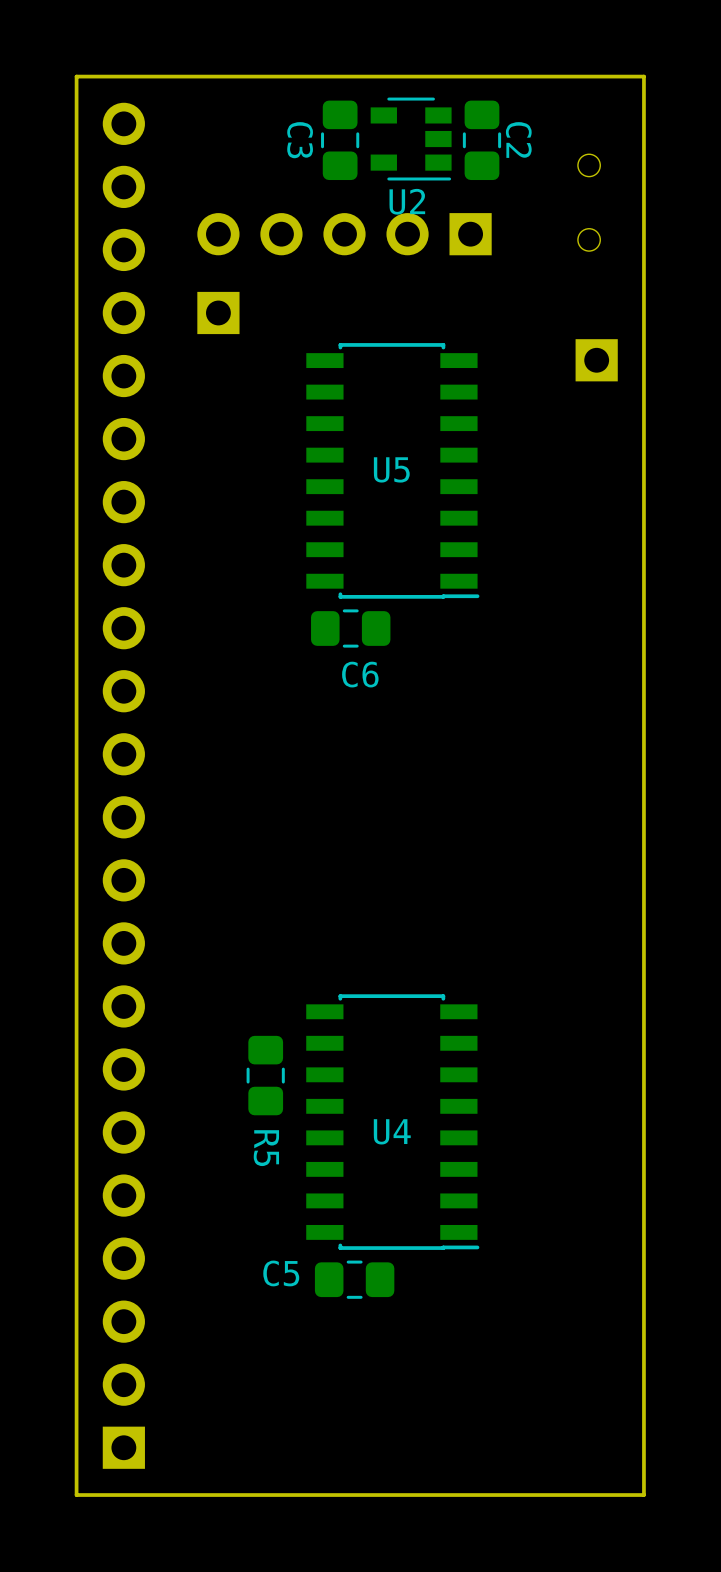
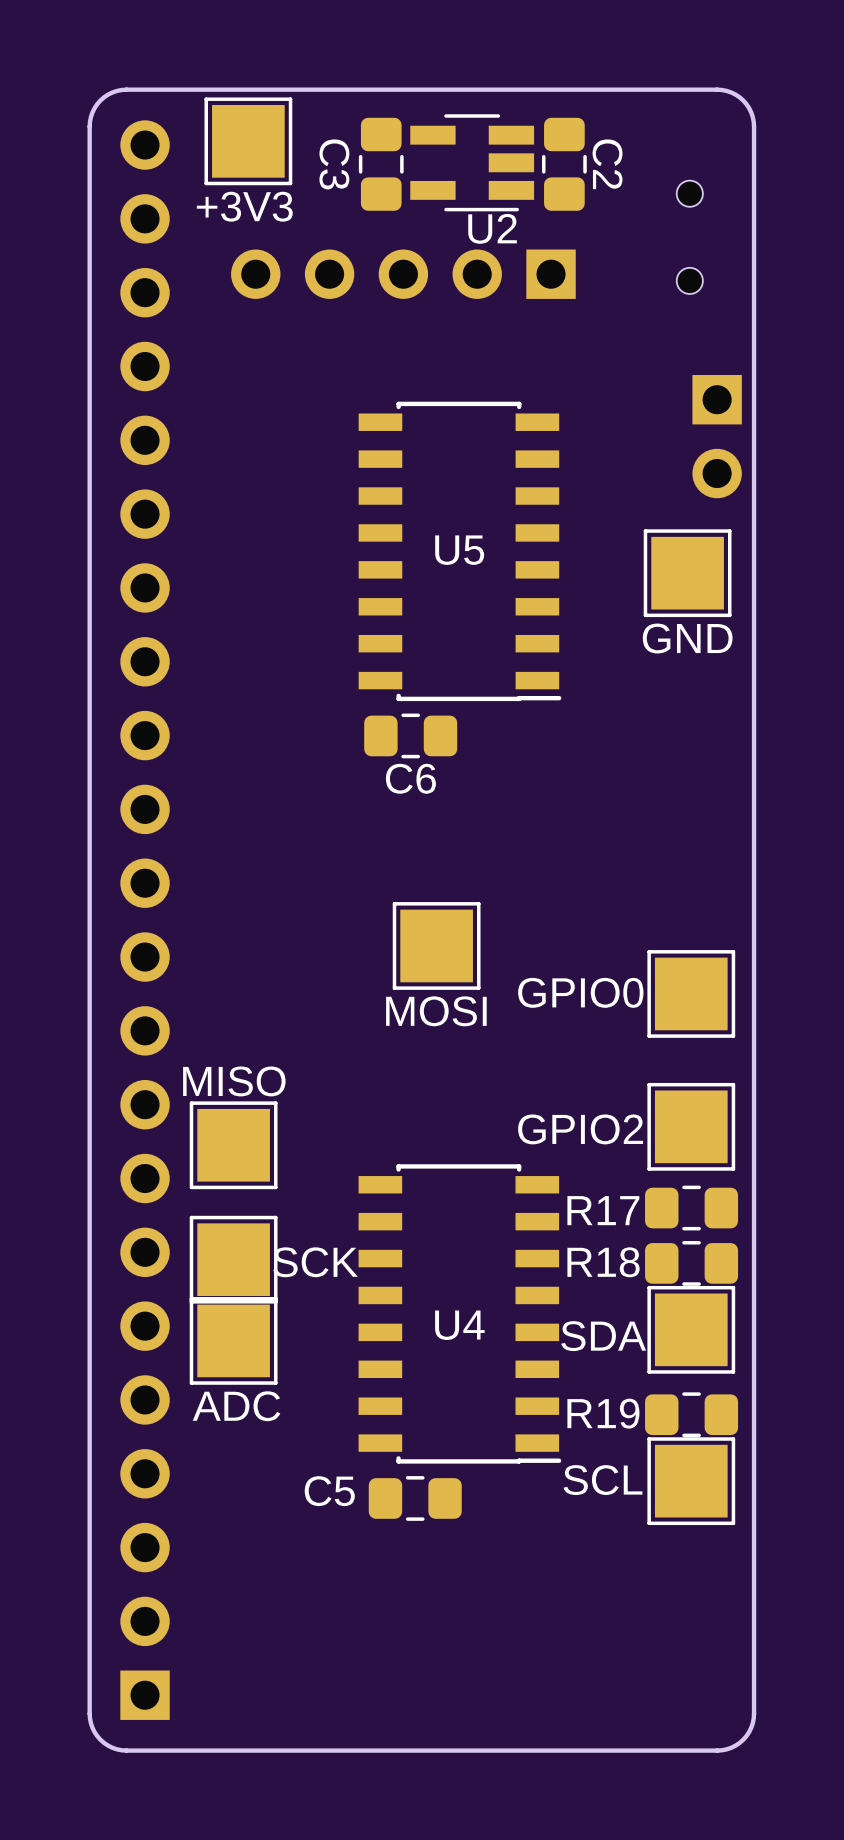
board edge: (108, 76) (76, 76) (76, 108) -> (126, 89) (112, 92) (100, 100) (92, 112) (89, 126)
board edge: (612, 76) (643, 76) (643, 108) -> (717, 89) (731, 92) (743, 100) (751, 112) (754, 126)
U2 footprint: [370, 97, 452, 181] -> [410, 114, 535, 212]
part: none -> (248, 141)
C3 position: (340, 140) -> (381, 164)
text: none -> +3V3 (244, 206)
U2 name position: U2 (407, 201) -> U2 (492, 228)
part: (218, 312) -> none
part footprint: [575, 339, 618, 382] -> [692, 375, 742, 499]
part: none -> (687, 573)
text: none -> GND (687, 638)
C6 name position: C6 (360, 674) -> C6 (410, 778)
part: none -> (436, 945)
text: none -> GPIO0 (580, 992)
part: none -> (691, 993)
text: none -> MOSI (436, 1011)
text: none -> MISO (234, 1081)
part: none -> (691, 1126)
text: none -> GPIO2 (580, 1129)
part: none -> (233, 1145)
R17: none -> (691, 1208)
part: none -> (233, 1259)
R5: (265, 1075) -> none
text: none -> SCK (315, 1262)
R18: none -> (691, 1263)
part: none -> (691, 1329)
text: none -> SDA (603, 1336)
part: none -> (233, 1340)
text: none -> ADC (236, 1406)
R19: none -> (691, 1414)
text: none -> SCL (602, 1480)
part: none -> (691, 1481)
board edge: (76, 1463) (76, 1495) (108, 1495) -> (89, 1713) (92, 1727) (100, 1739) (112, 1747) (126, 1750)
board edge: (643, 1463) (643, 1495) (612, 1495) -> (754, 1713) (751, 1727) (743, 1739) (731, 1747) (717, 1750)

